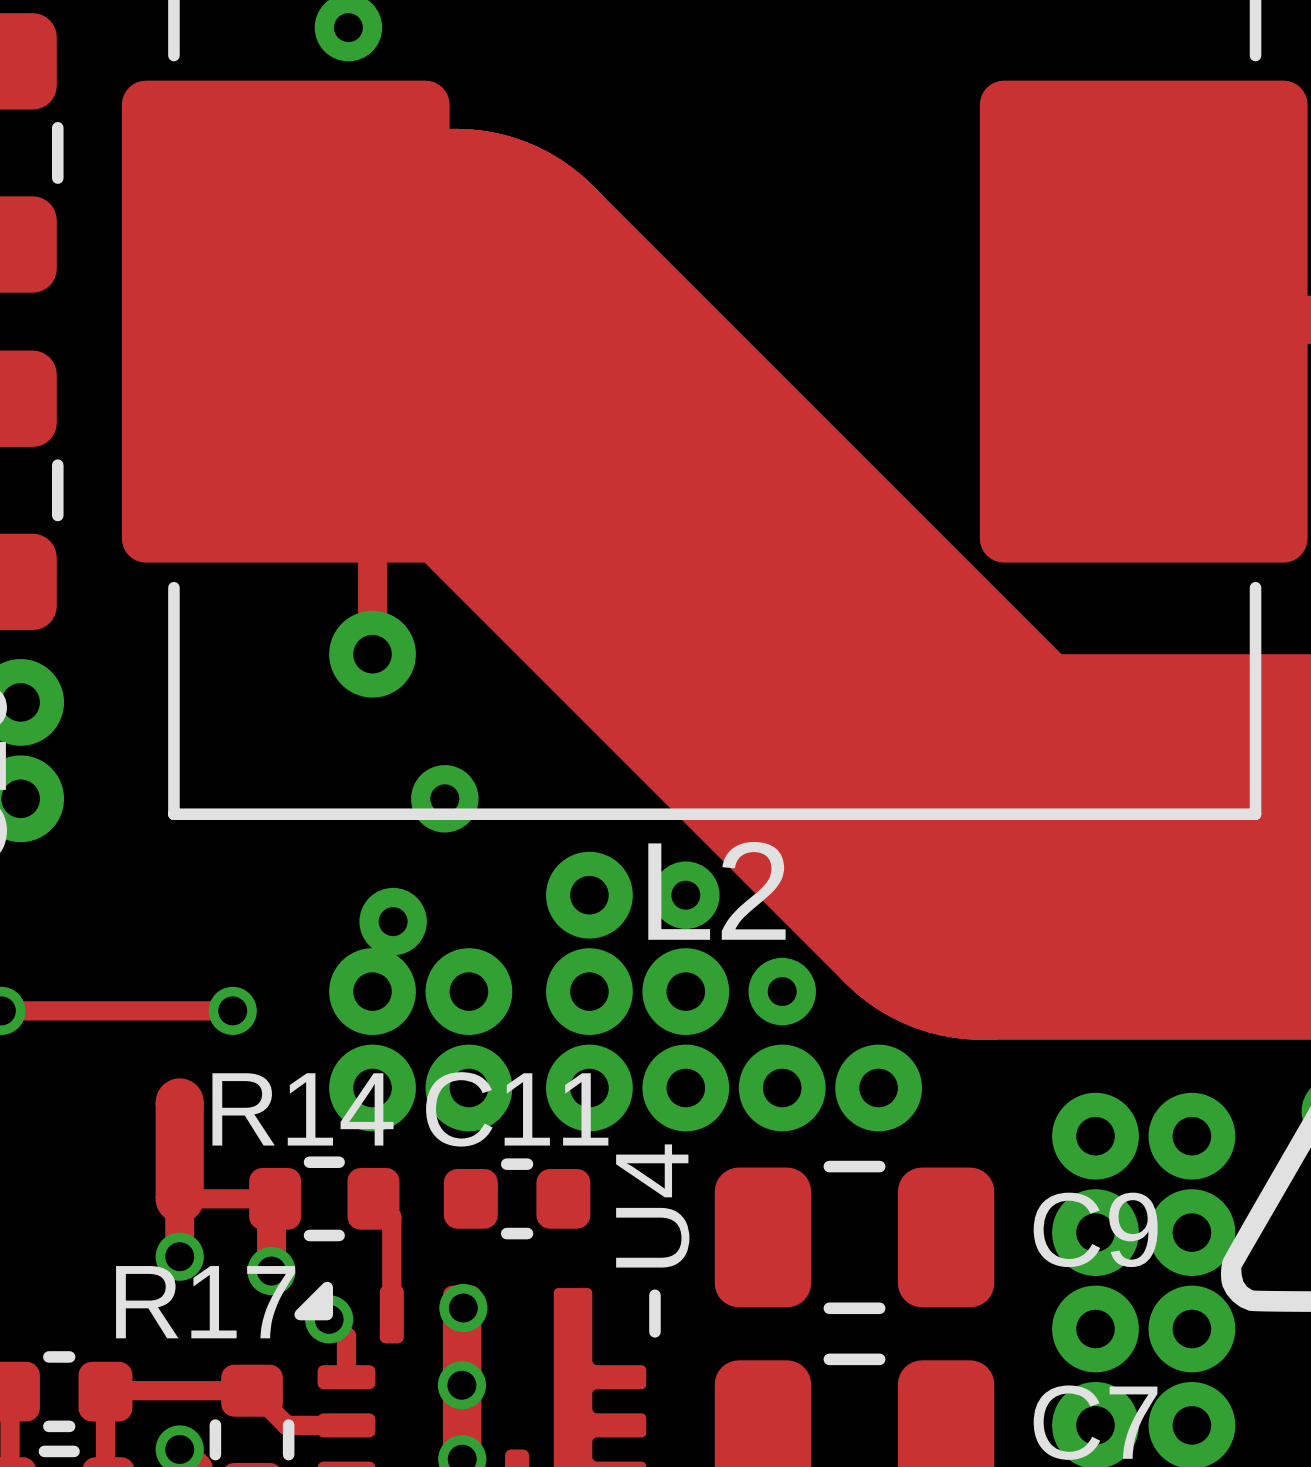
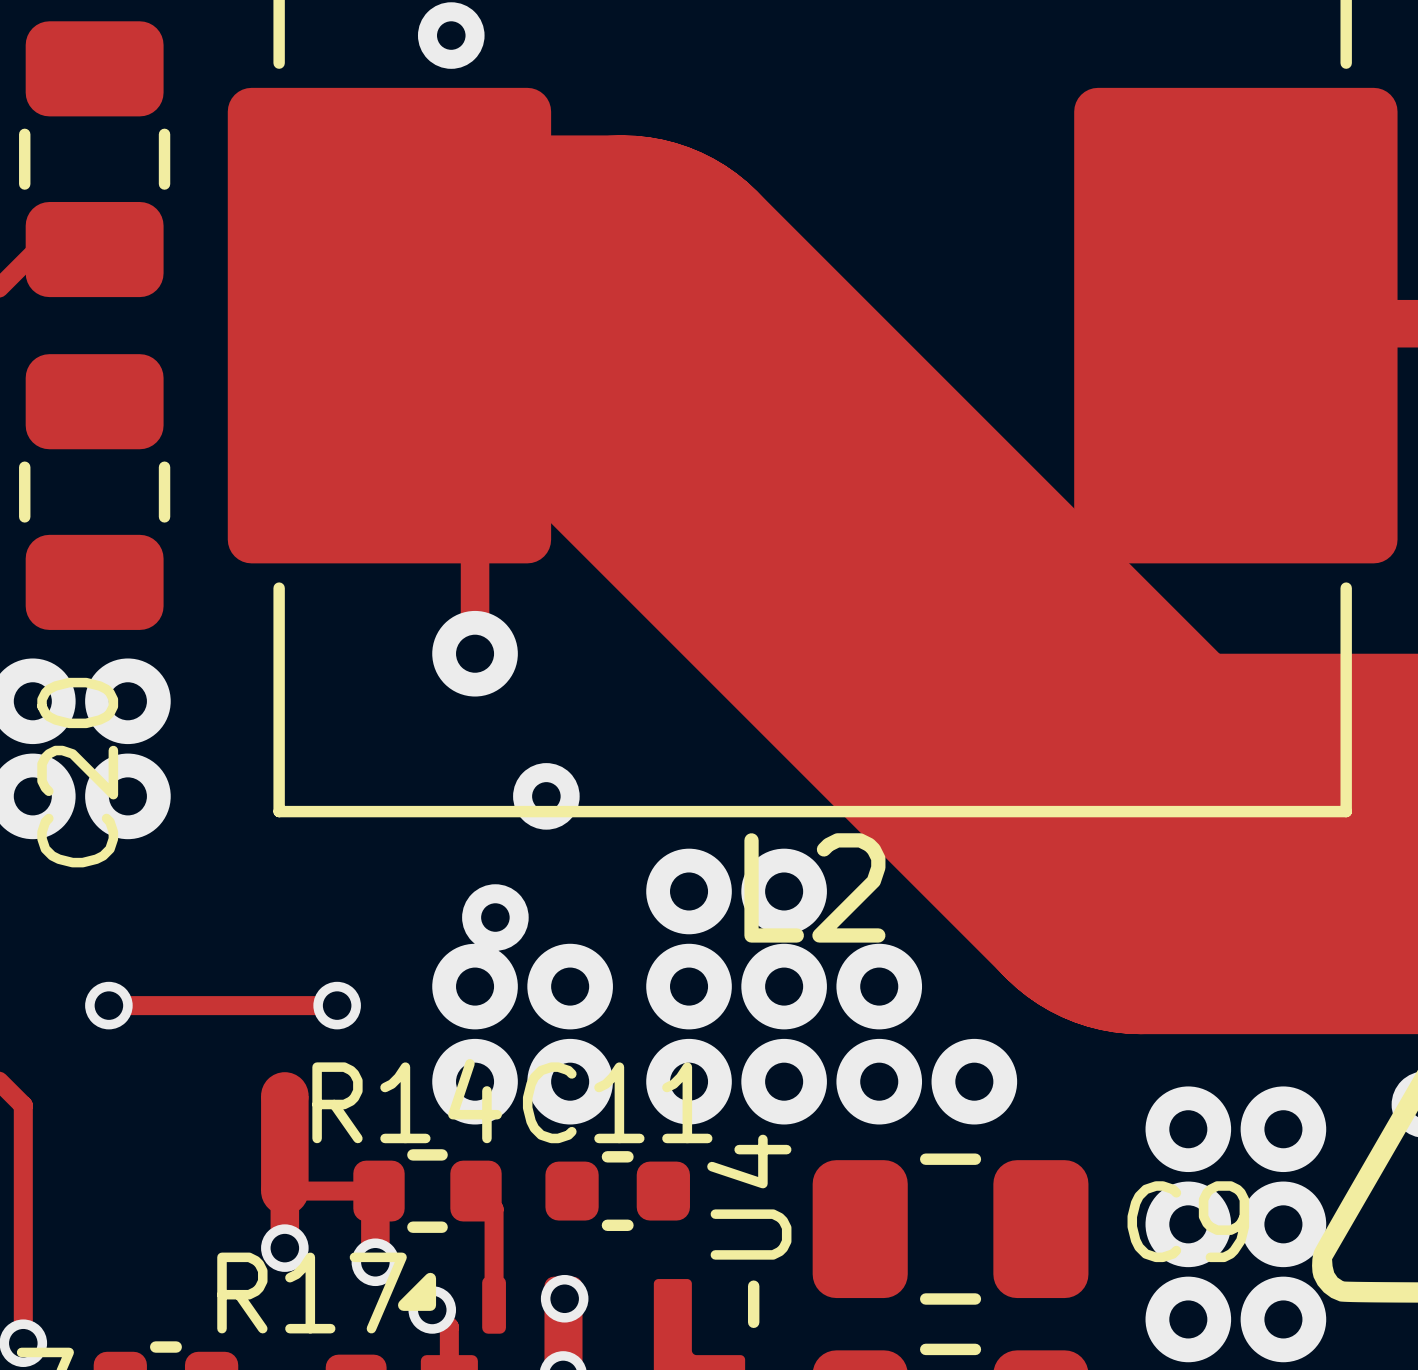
track: (456, 321) (981, 847) (1047, 847) -> (557, 325) (622, 325) (1140, 843)
via size: [652, 861, 720, 929] -> [741, 848, 827, 935]
via size: [748, 957, 816, 1026] -> [836, 943, 923, 1030]

